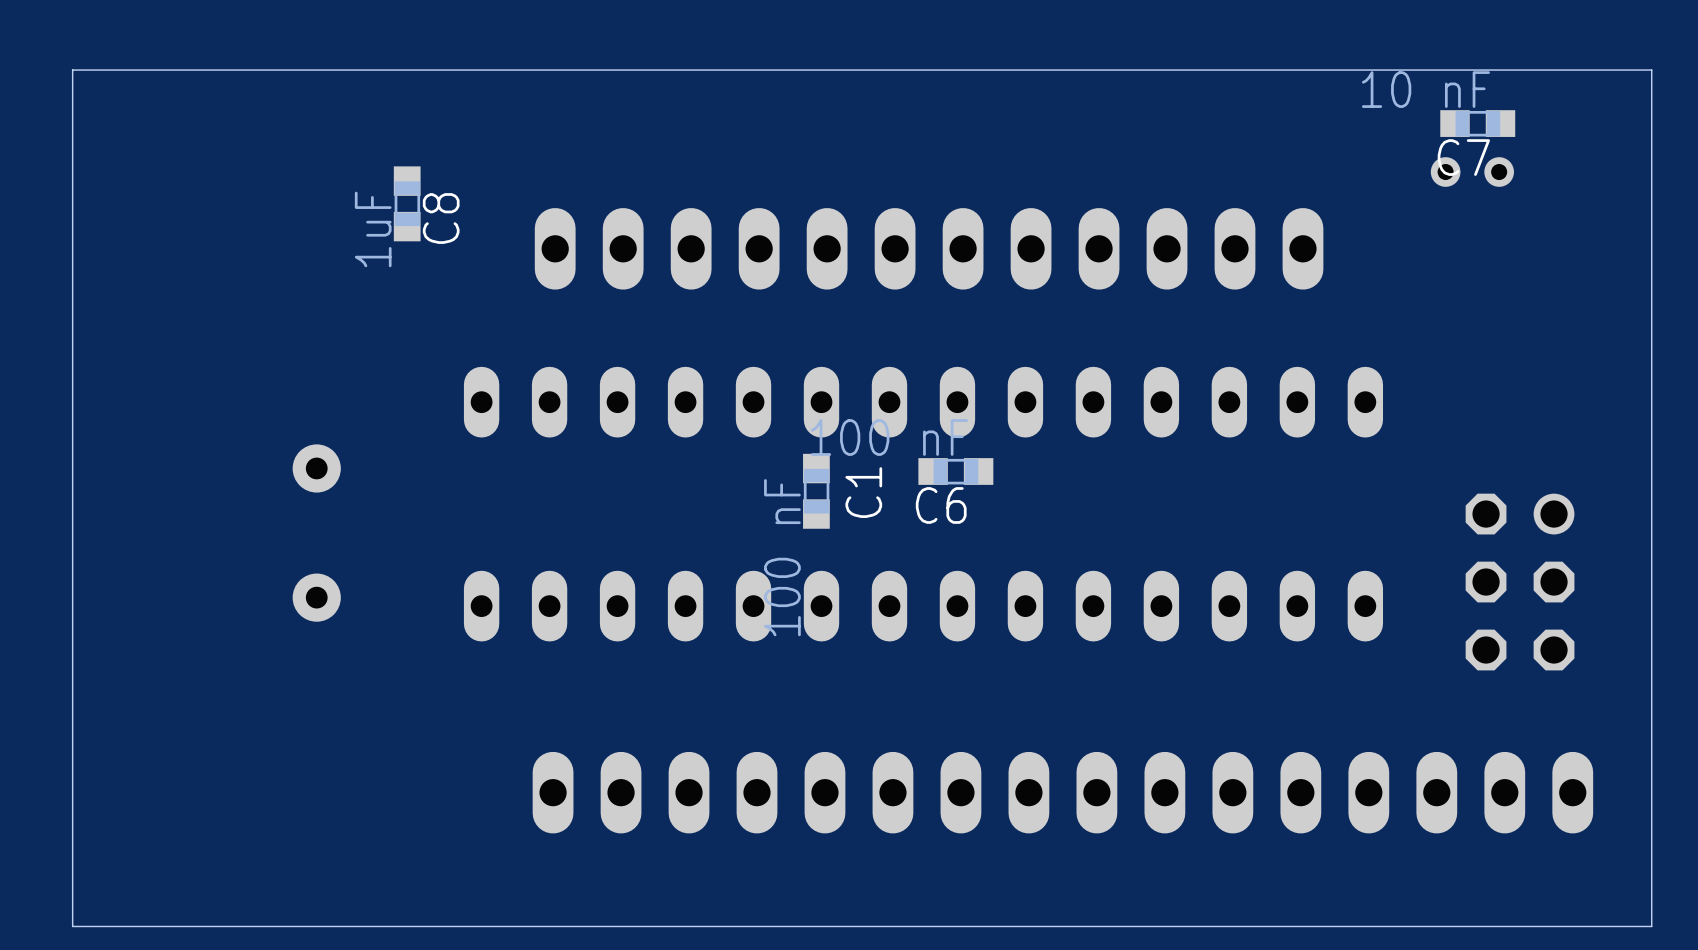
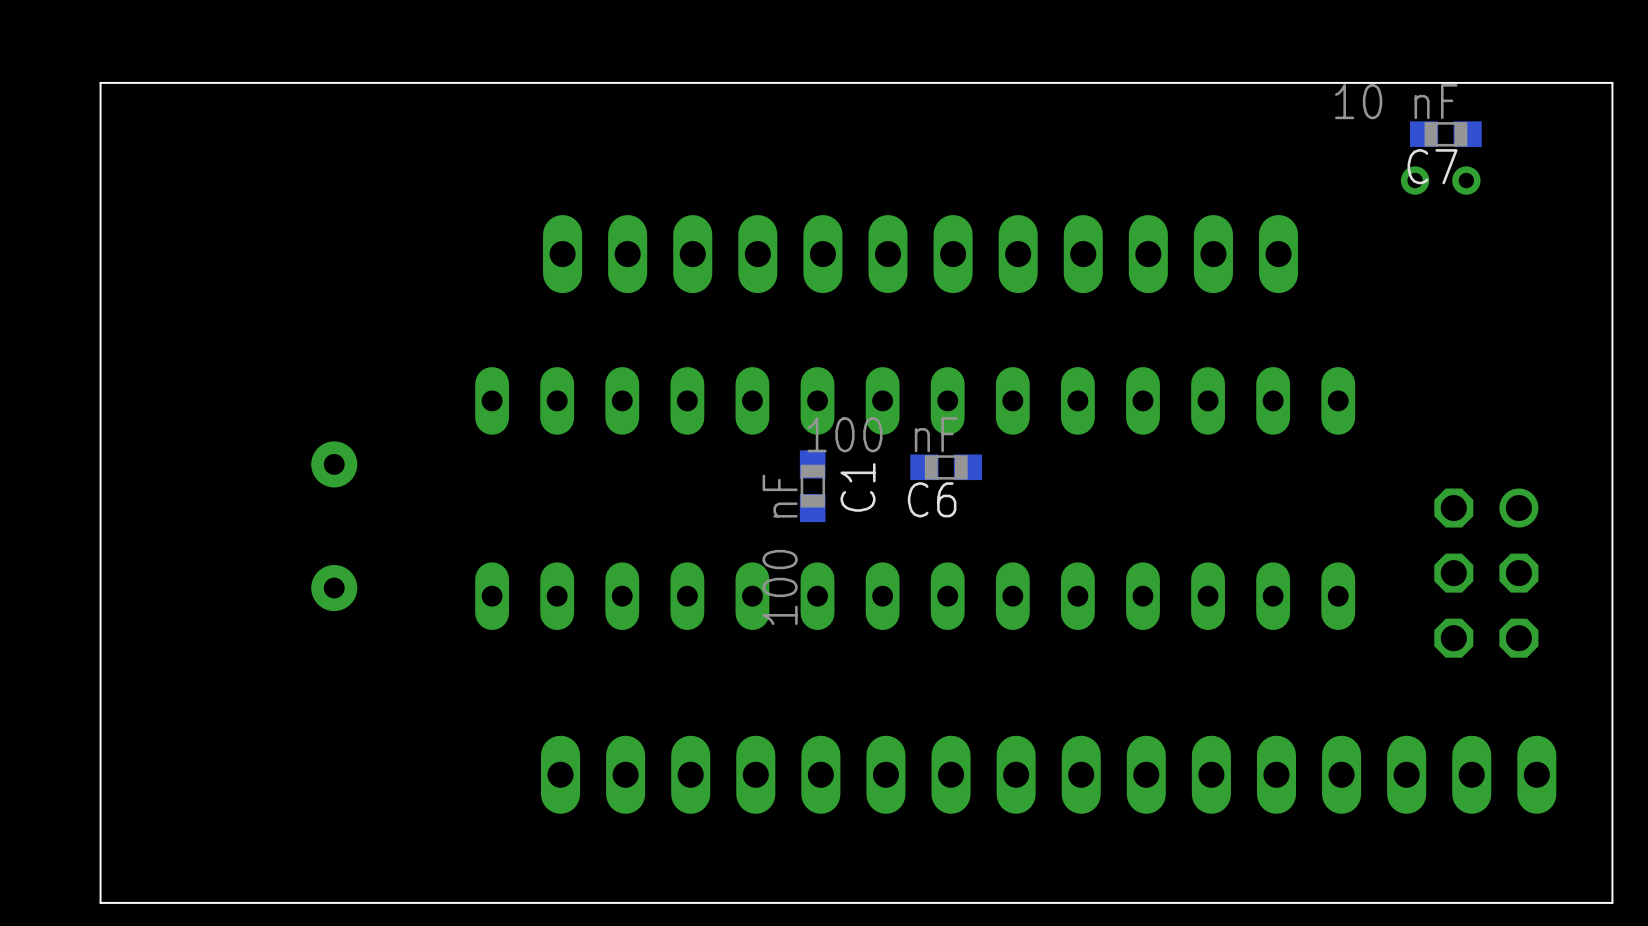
C8: 1uF (407, 203) -> none

